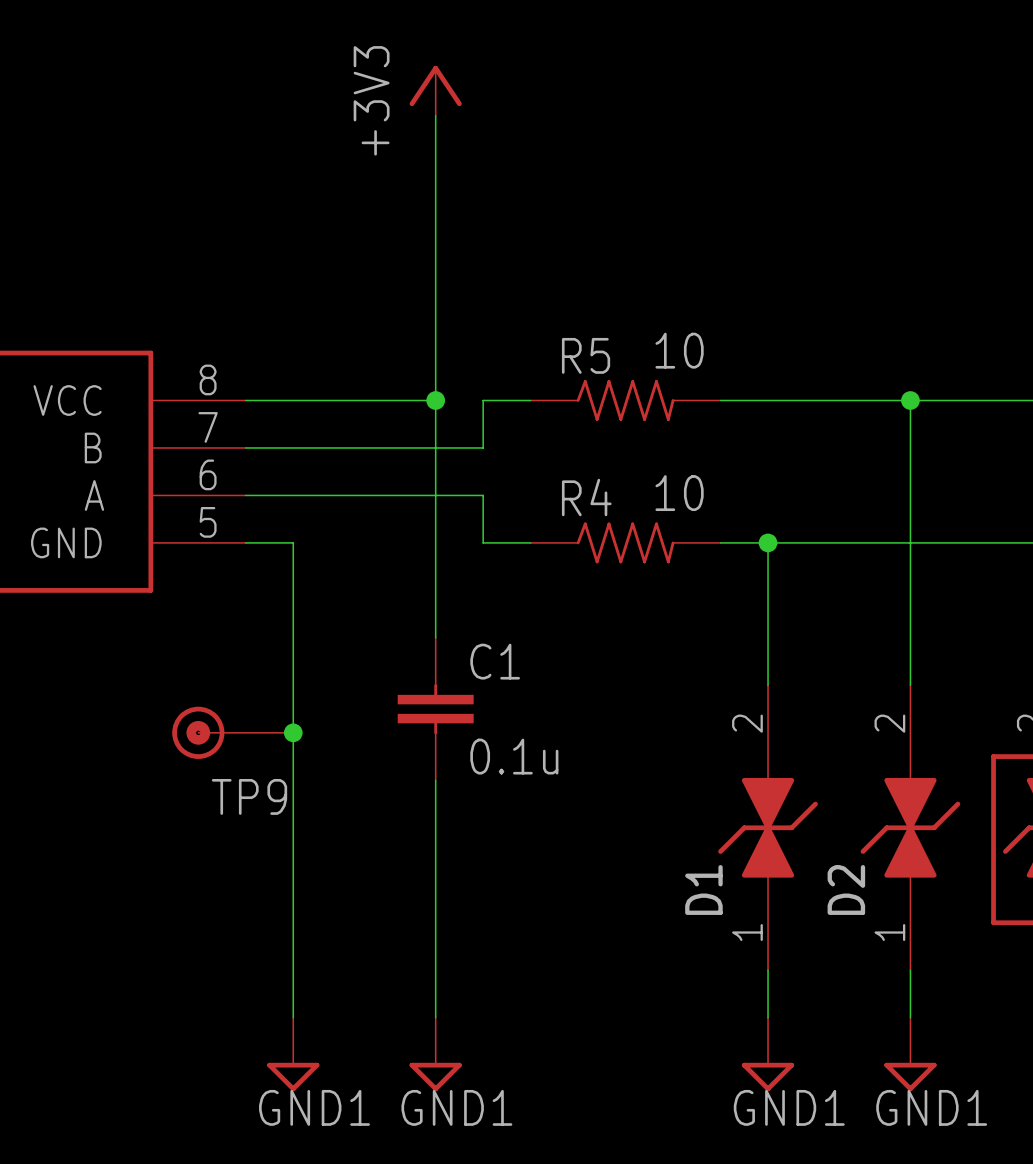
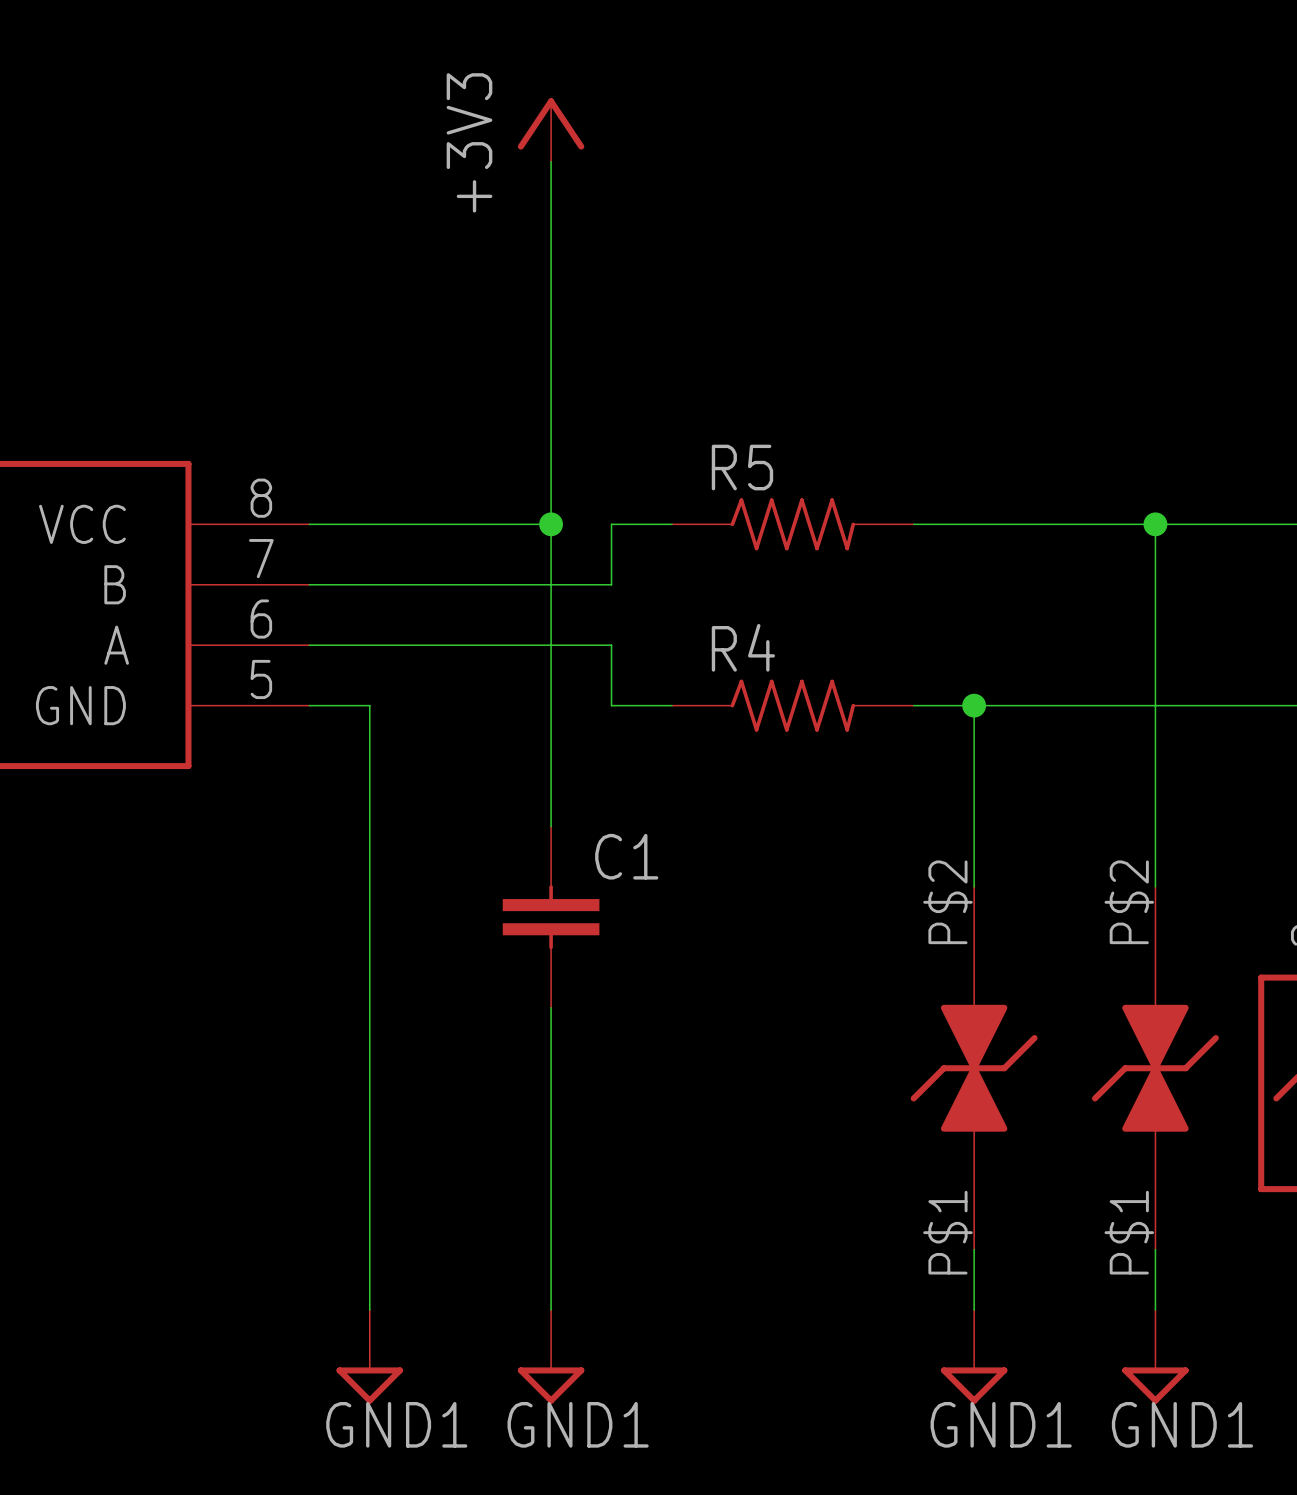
R5 value: 10 (679, 350) -> none
R4 value: 10 (679, 493) -> none
D1 pin number: 2 (747, 723) -> P$2 (947, 902)
D2 pin number: 2 (889, 723) -> P$2 (1129, 902)
TP9: (232, 732) -> none
junction: (293, 732) -> none
C1 value: 0.1u (514, 756) -> none
D1 name: D1 (703, 889) -> none
D2 name: D2 (846, 889) -> none
D1 pin number: 1 (747, 932) -> P$1 (947, 1232)
D2 pin number: 1 (889, 932) -> P$1 (1129, 1232)

